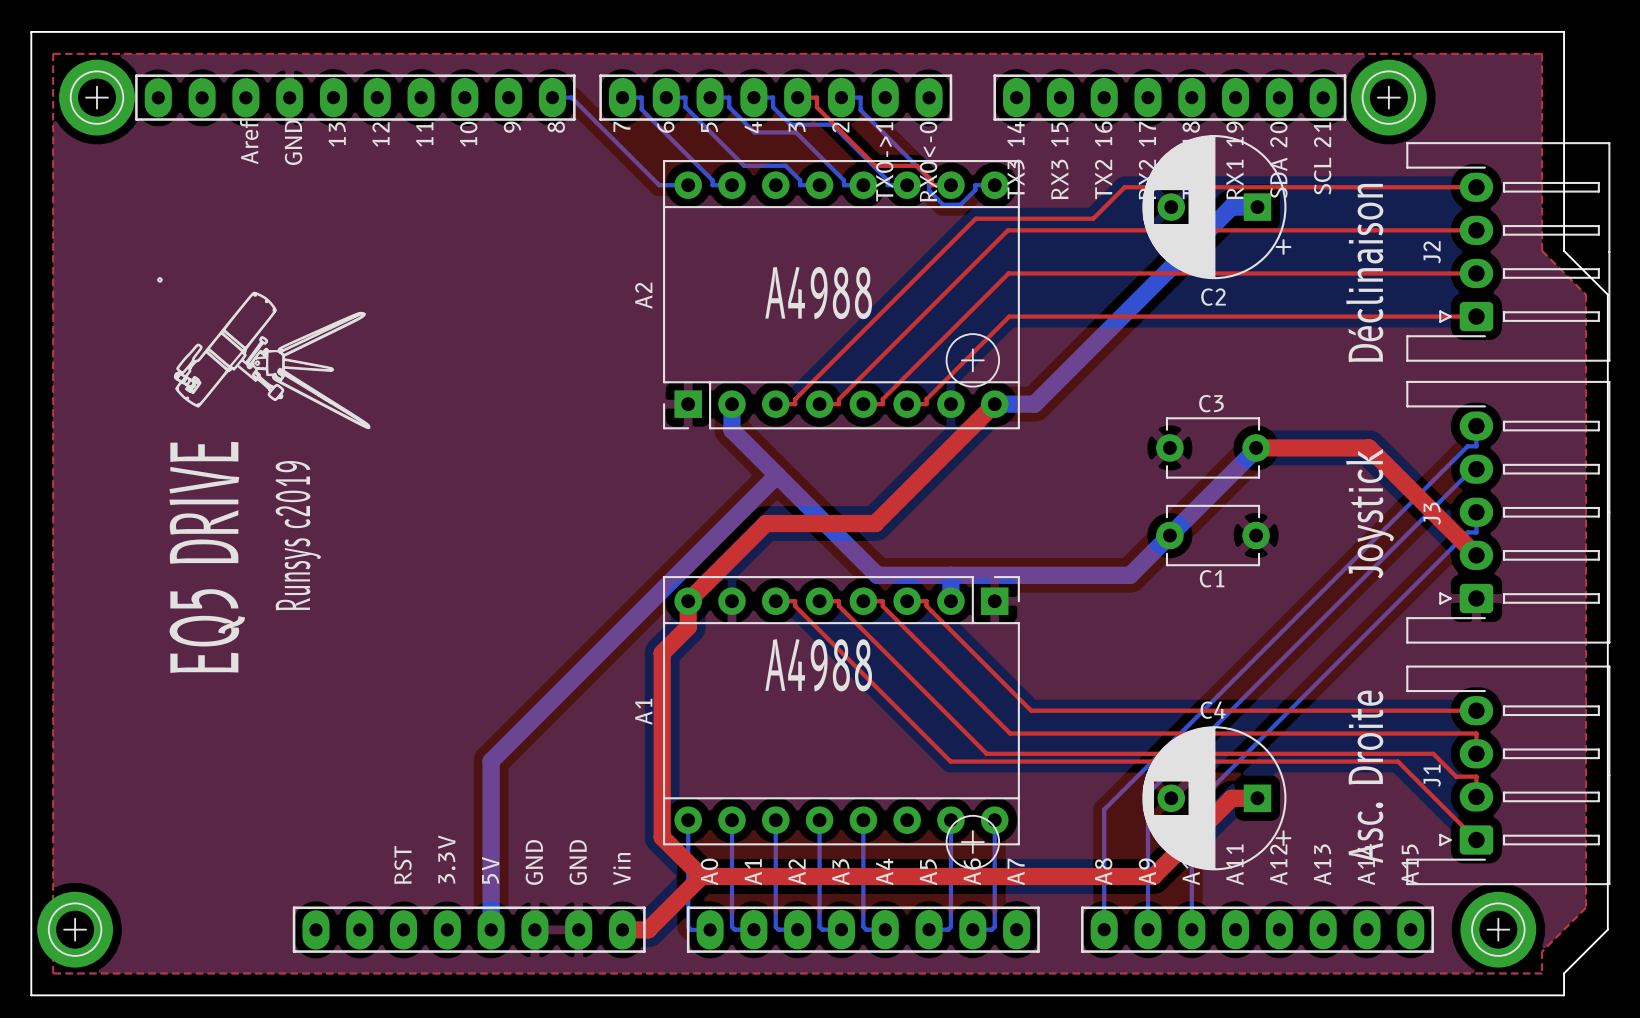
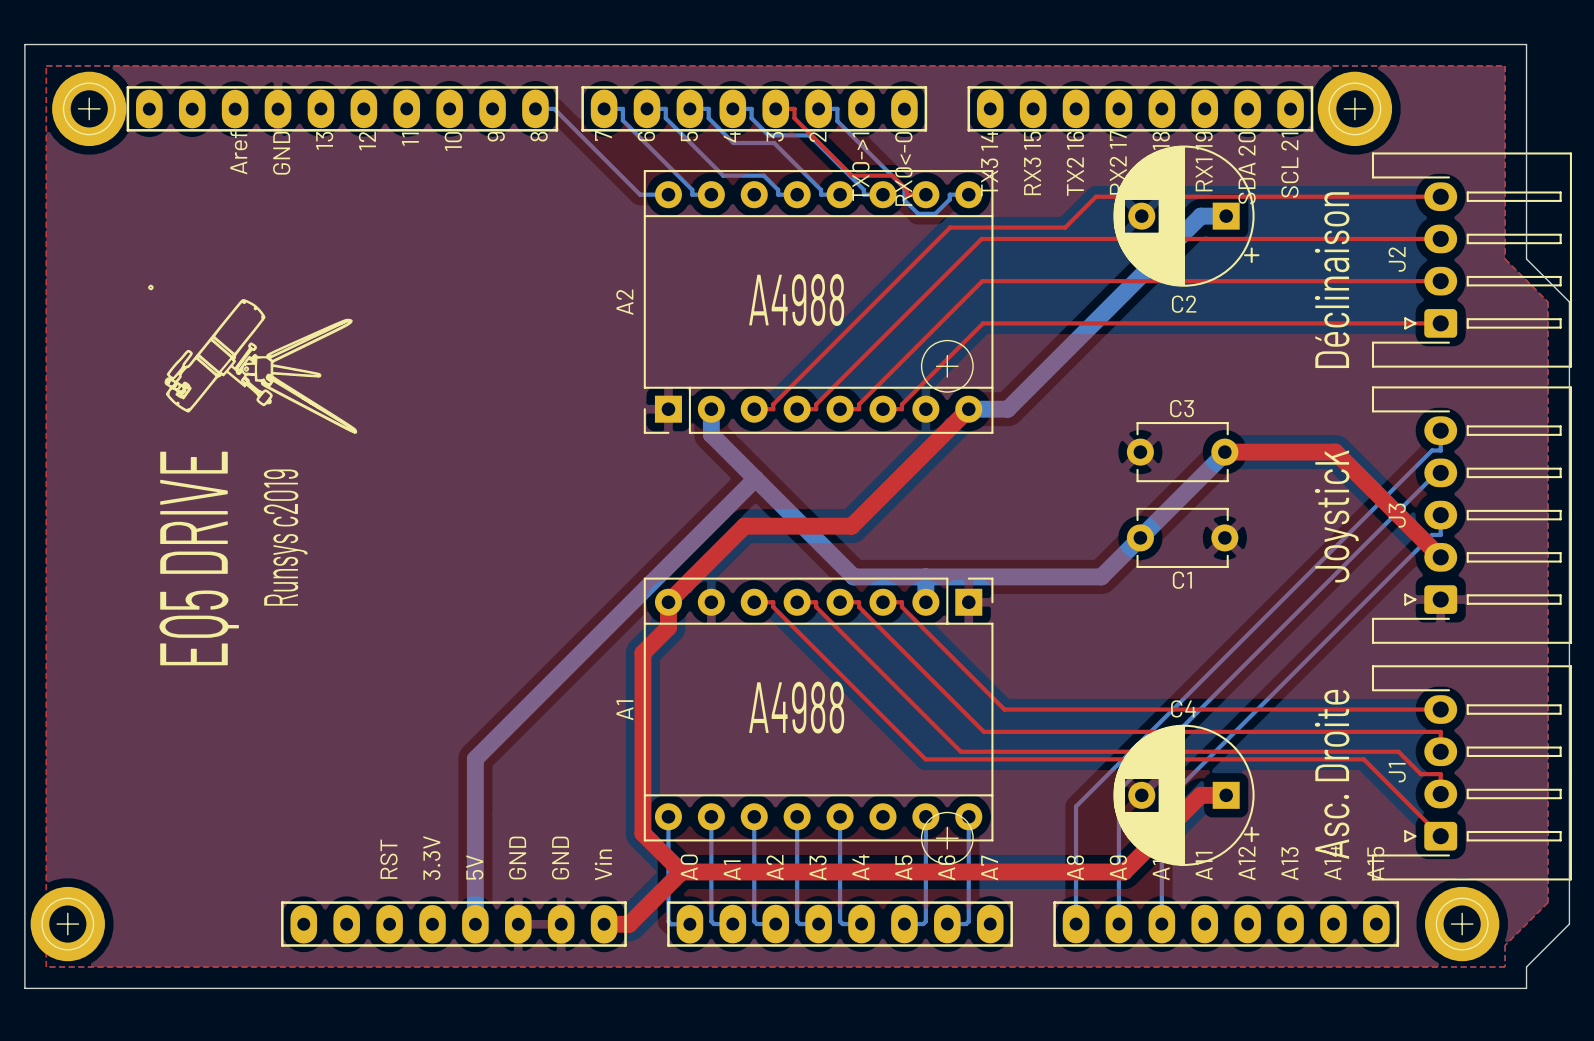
text position: A4988 (818, 665) -> A4988 (796, 707)

